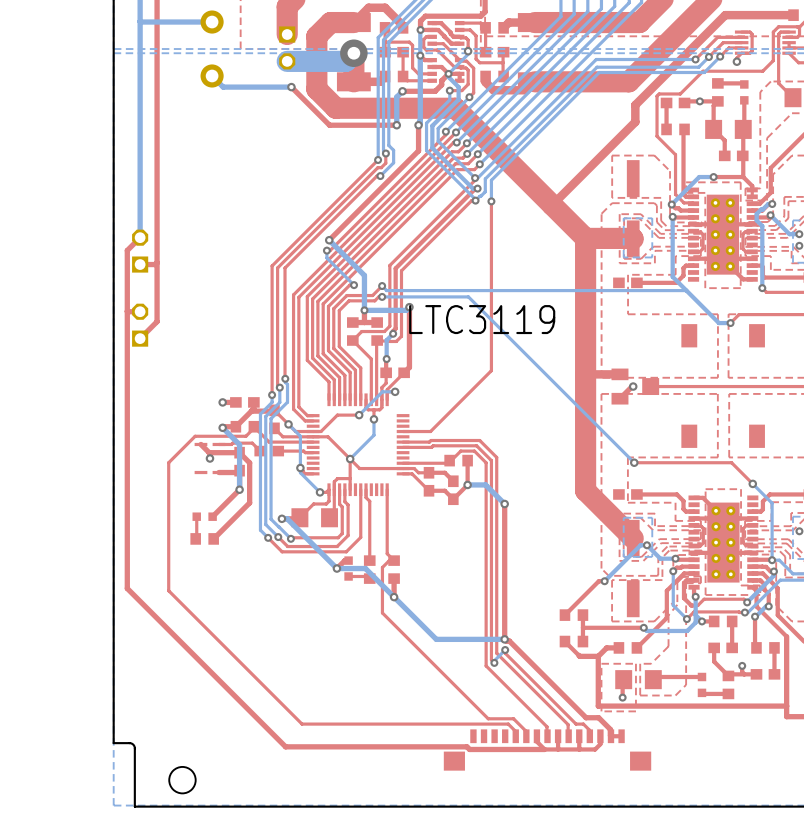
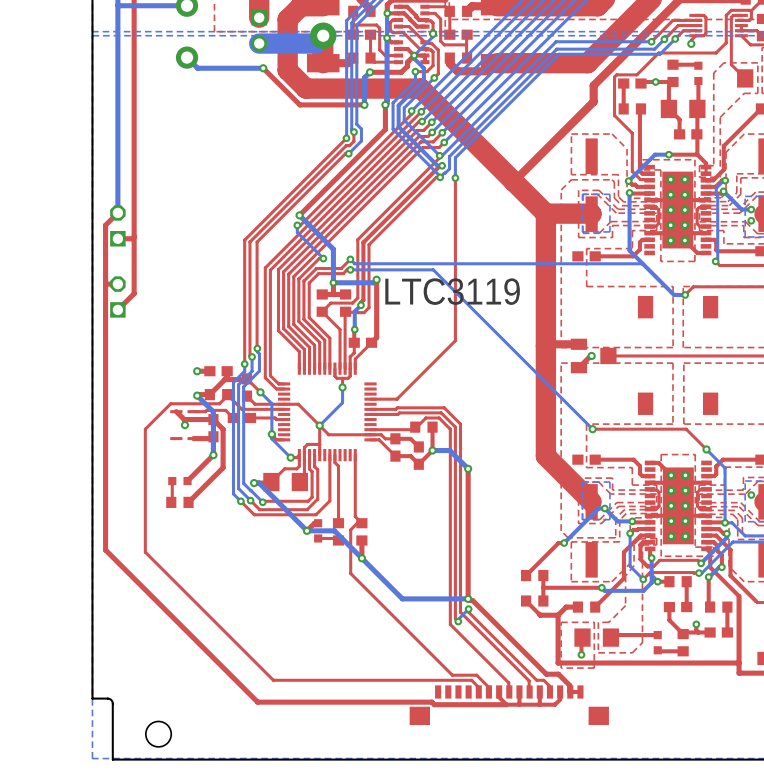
bottom track: (772, 204) (768, 204) (756, 214) (756, 220) (762, 226) (762, 288) -> none
bottom track: none -> (723, 181) (716, 188) (717, 259)
bottom track: (395, 391) (382, 391) (359, 415) -> none
via: (395, 391) -> none
top track: (359, 415) (337, 415) (321, 431) (295, 431) (288, 424) -> none
via: (359, 415) -> none

